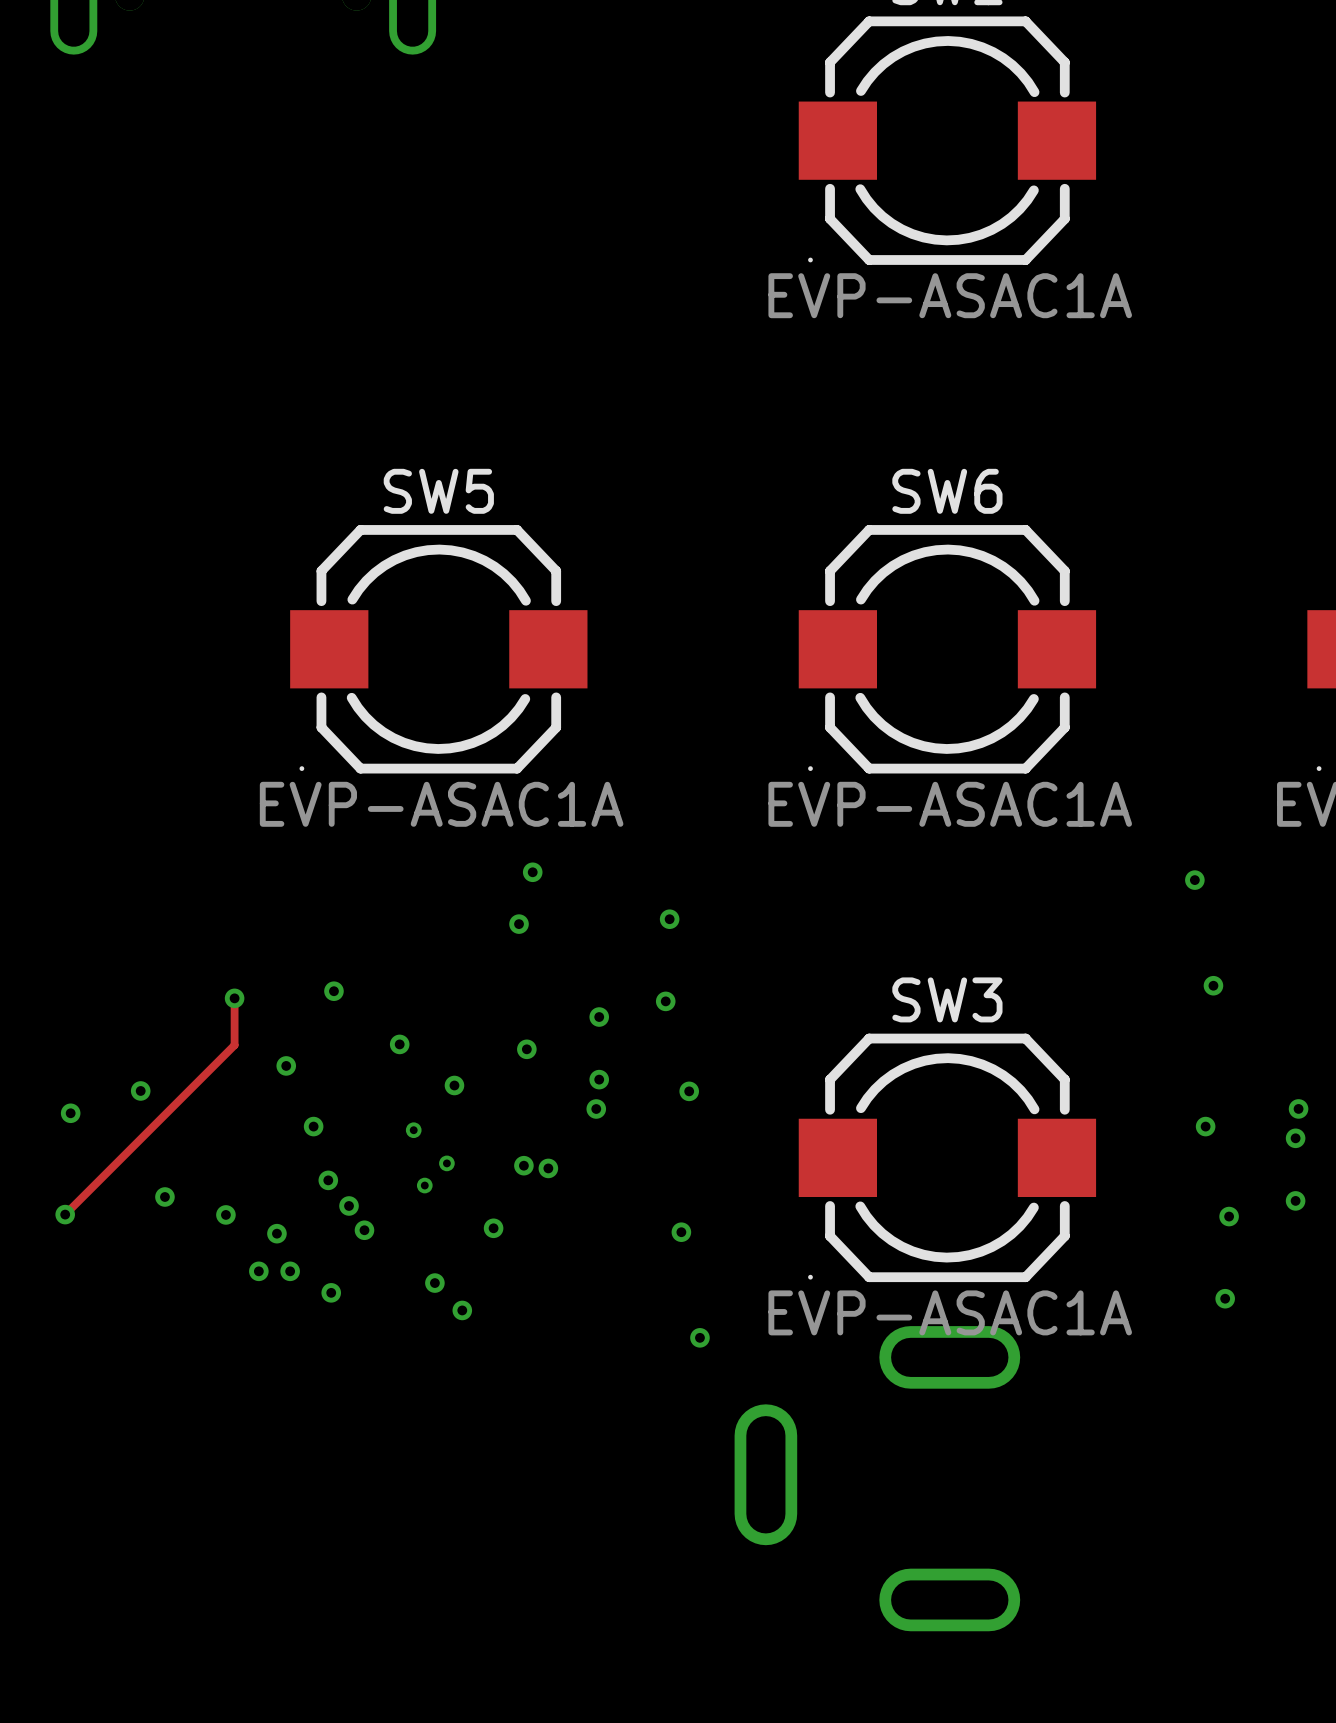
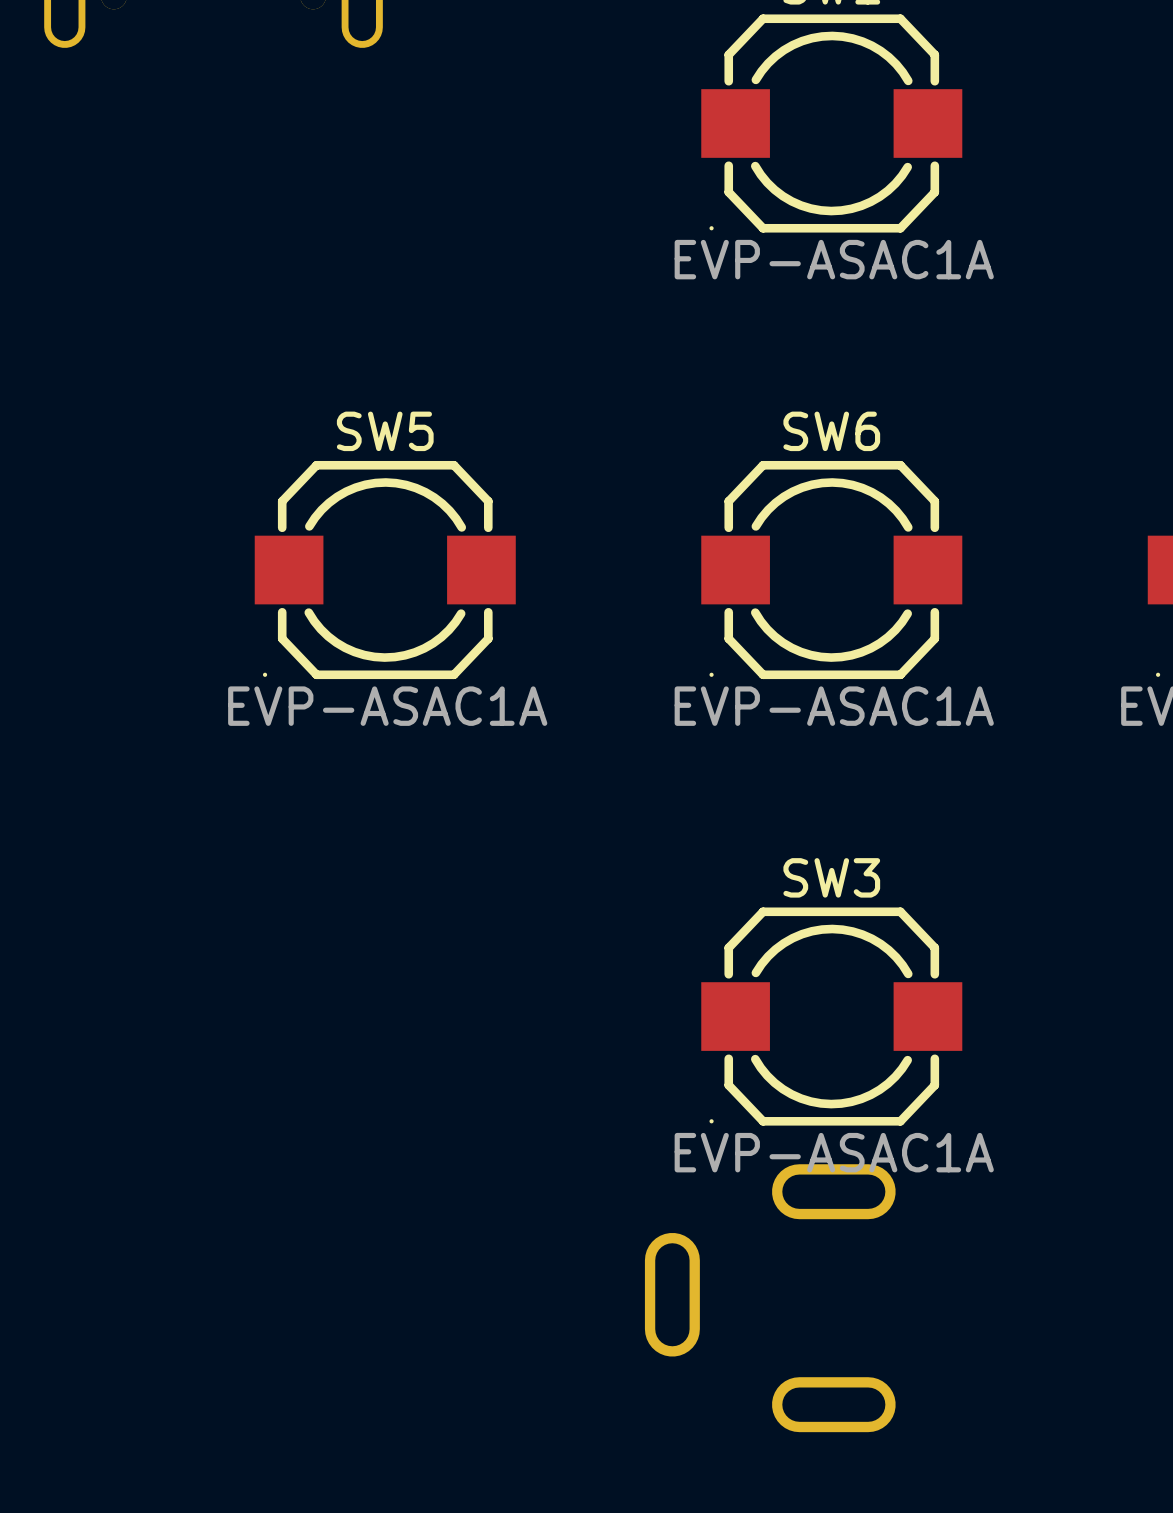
via: (532, 872) -> none
via: (1194, 880) -> none
via: (669, 919) -> none
via: (519, 924) -> none
via: (1213, 985) -> none
via: (333, 991) -> none
track: (234, 998) (234, 1045) (65, 1214) -> none
via: (234, 998) -> none
via: (665, 1001) -> none
via: (599, 1017) -> none
via: (399, 1044) -> none
via: (526, 1049) -> none
via: (286, 1065) -> none
via: (599, 1079) -> none
via: (454, 1085) -> none
via: (140, 1090) -> none
via: (689, 1091) -> none
via: (596, 1108) -> none
via: (1298, 1108) -> none
via: (70, 1113) -> none
via: (313, 1126) -> none
via: (1205, 1126) -> none
via: (413, 1130) -> none
via: (1295, 1138) -> none
via: (446, 1163) -> none
via: (523, 1165) -> none
via: (548, 1168) -> none
via: (328, 1180) -> none
via: (424, 1185) -> none
via: (164, 1196) -> none
via: (1295, 1200) -> none
via: (349, 1205) -> none
via: (65, 1214) -> none
via: (225, 1214) -> none
via: (1229, 1216) -> none
via: (493, 1228) -> none
via: (364, 1230) -> none
via: (681, 1232) -> none
via: (276, 1233) -> none
via: (258, 1271) -> none
via: (290, 1271) -> none
via: (434, 1283) -> none
via: (331, 1292) -> none
via: (1225, 1298) -> none
via: (462, 1310) -> none
via: (699, 1337) -> none

